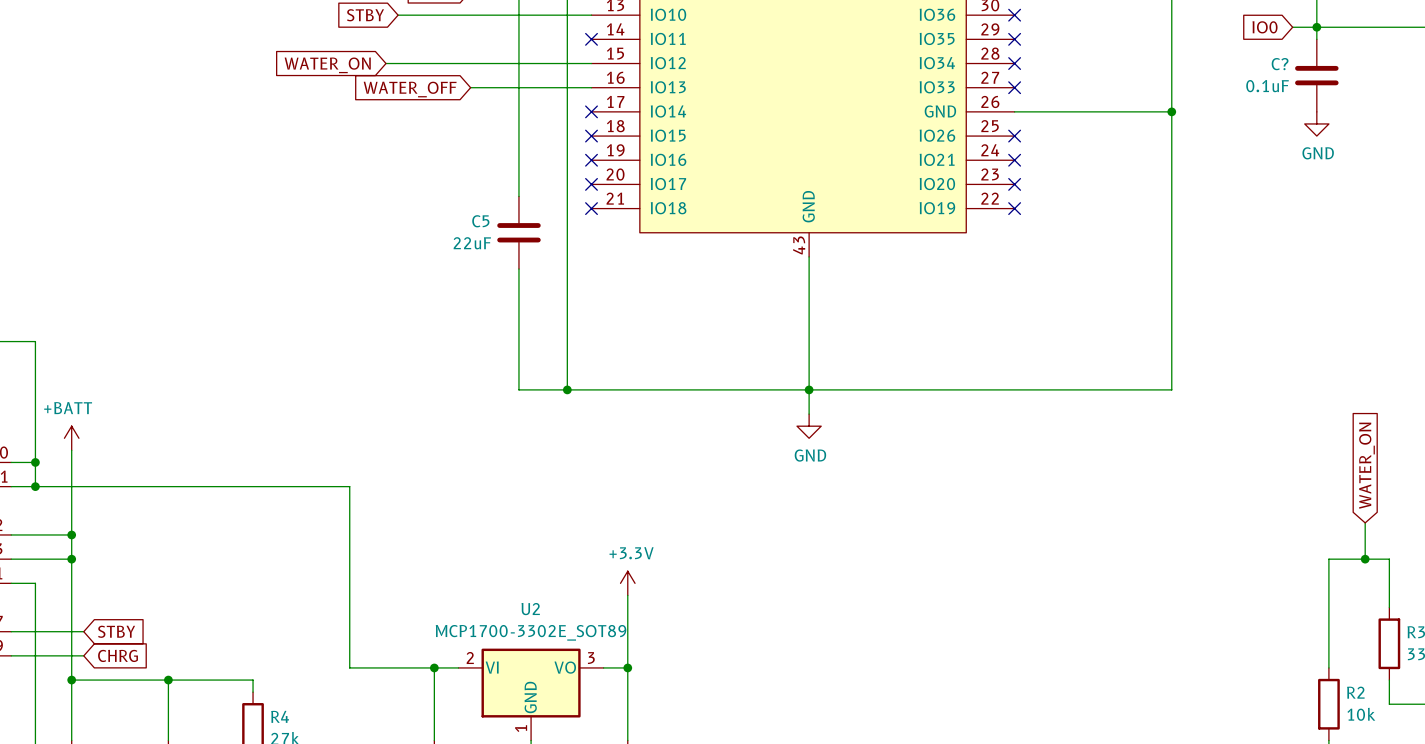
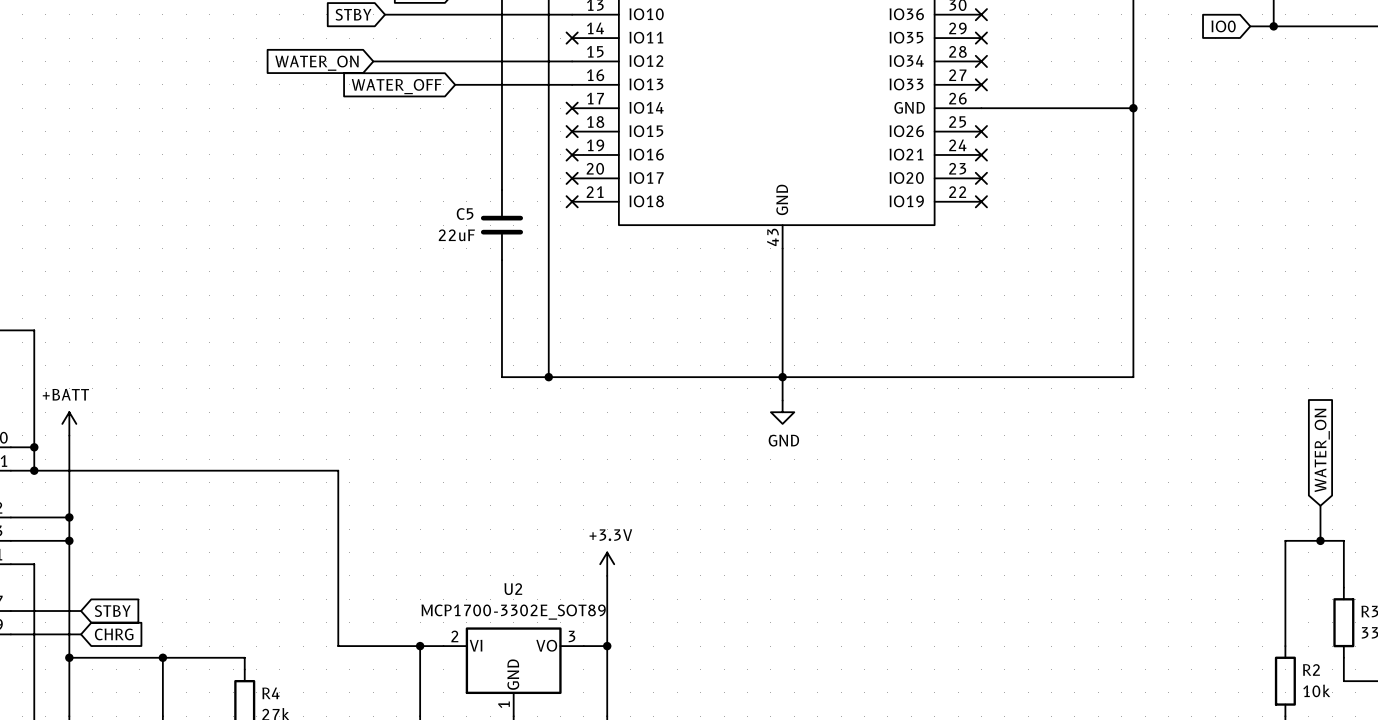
wire: (1316, 27) (1316, 39) -> none
C?: 0.1uF (1316, 75) -> none
power symbol: GND (1316, 123) -> none

